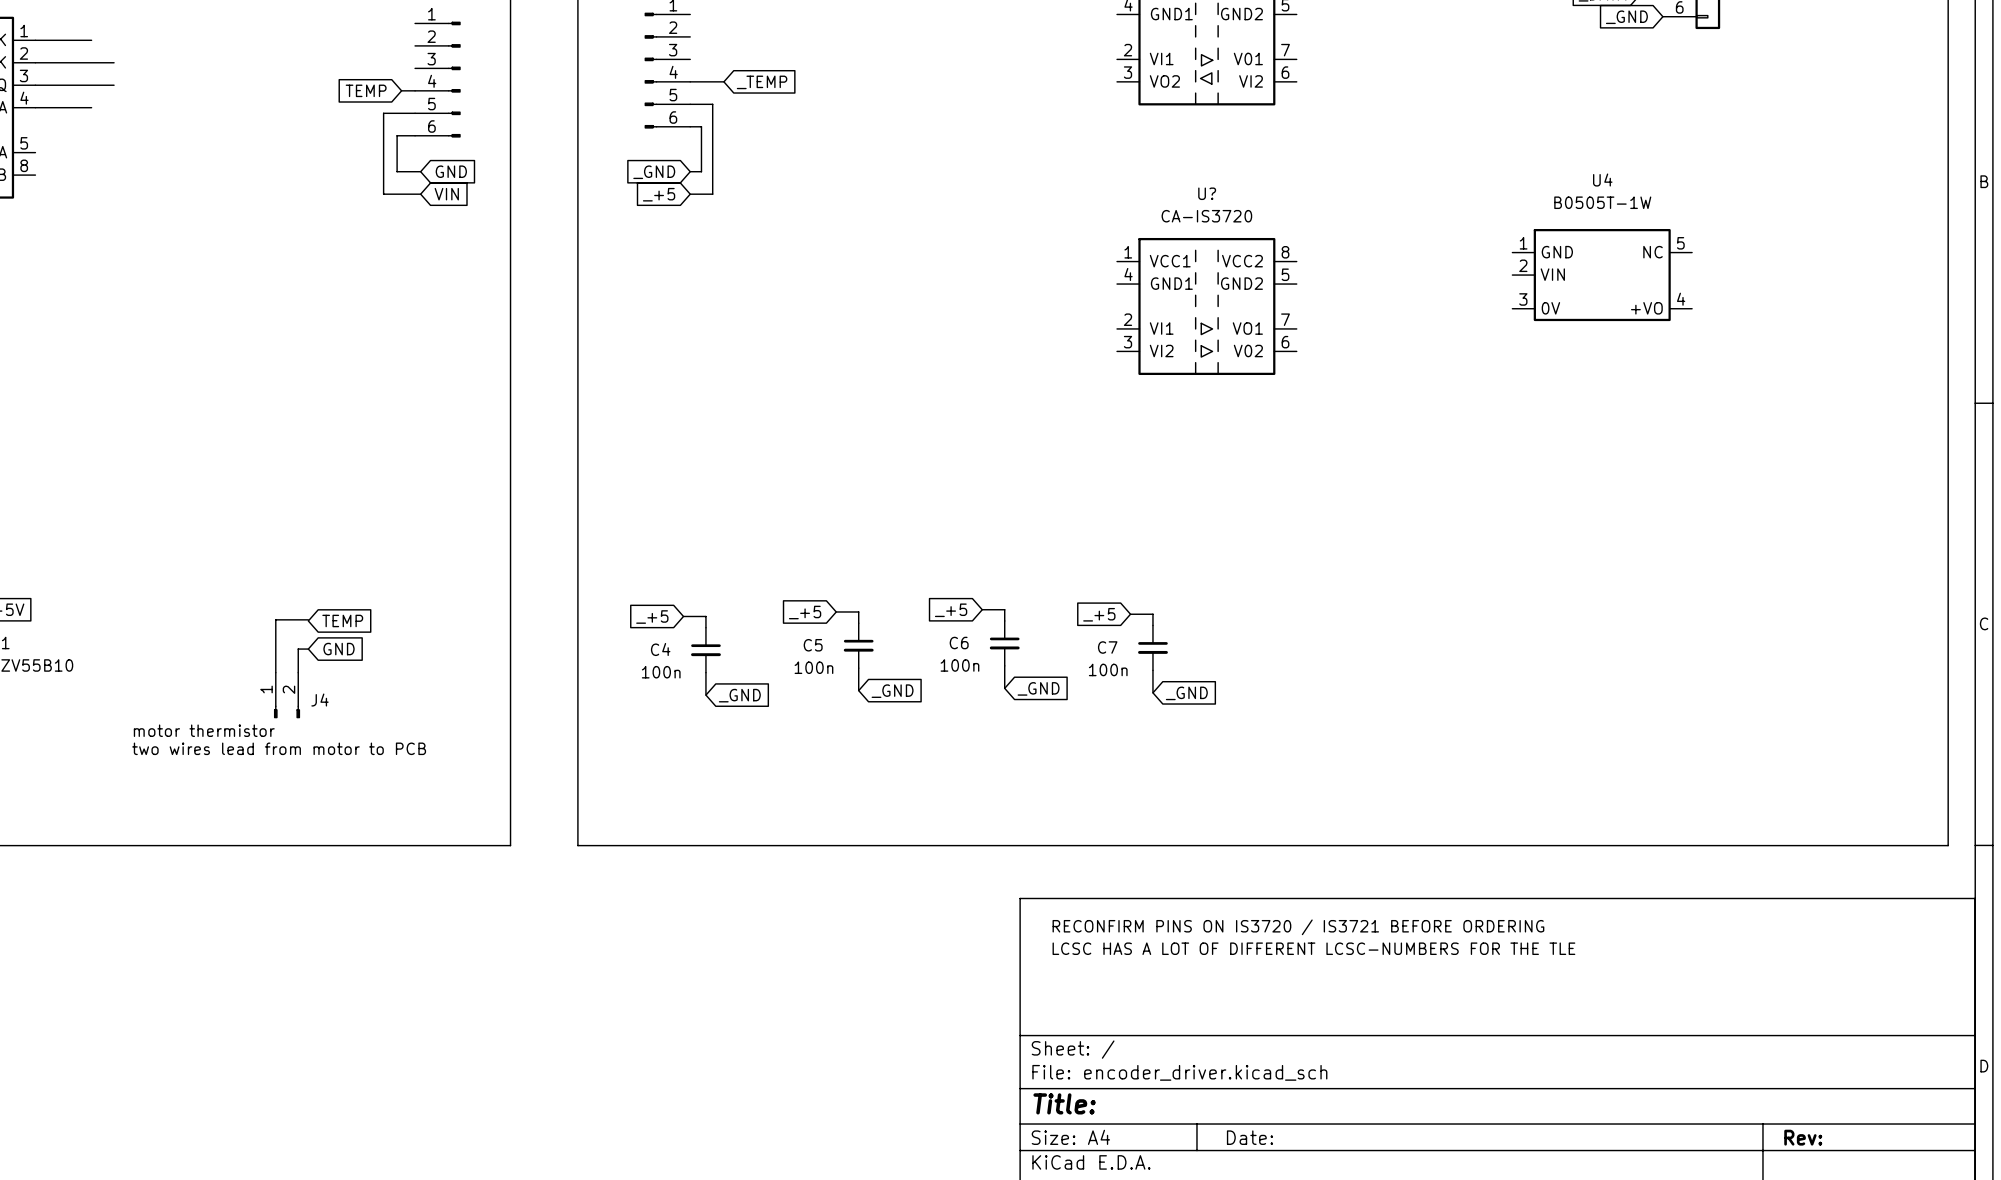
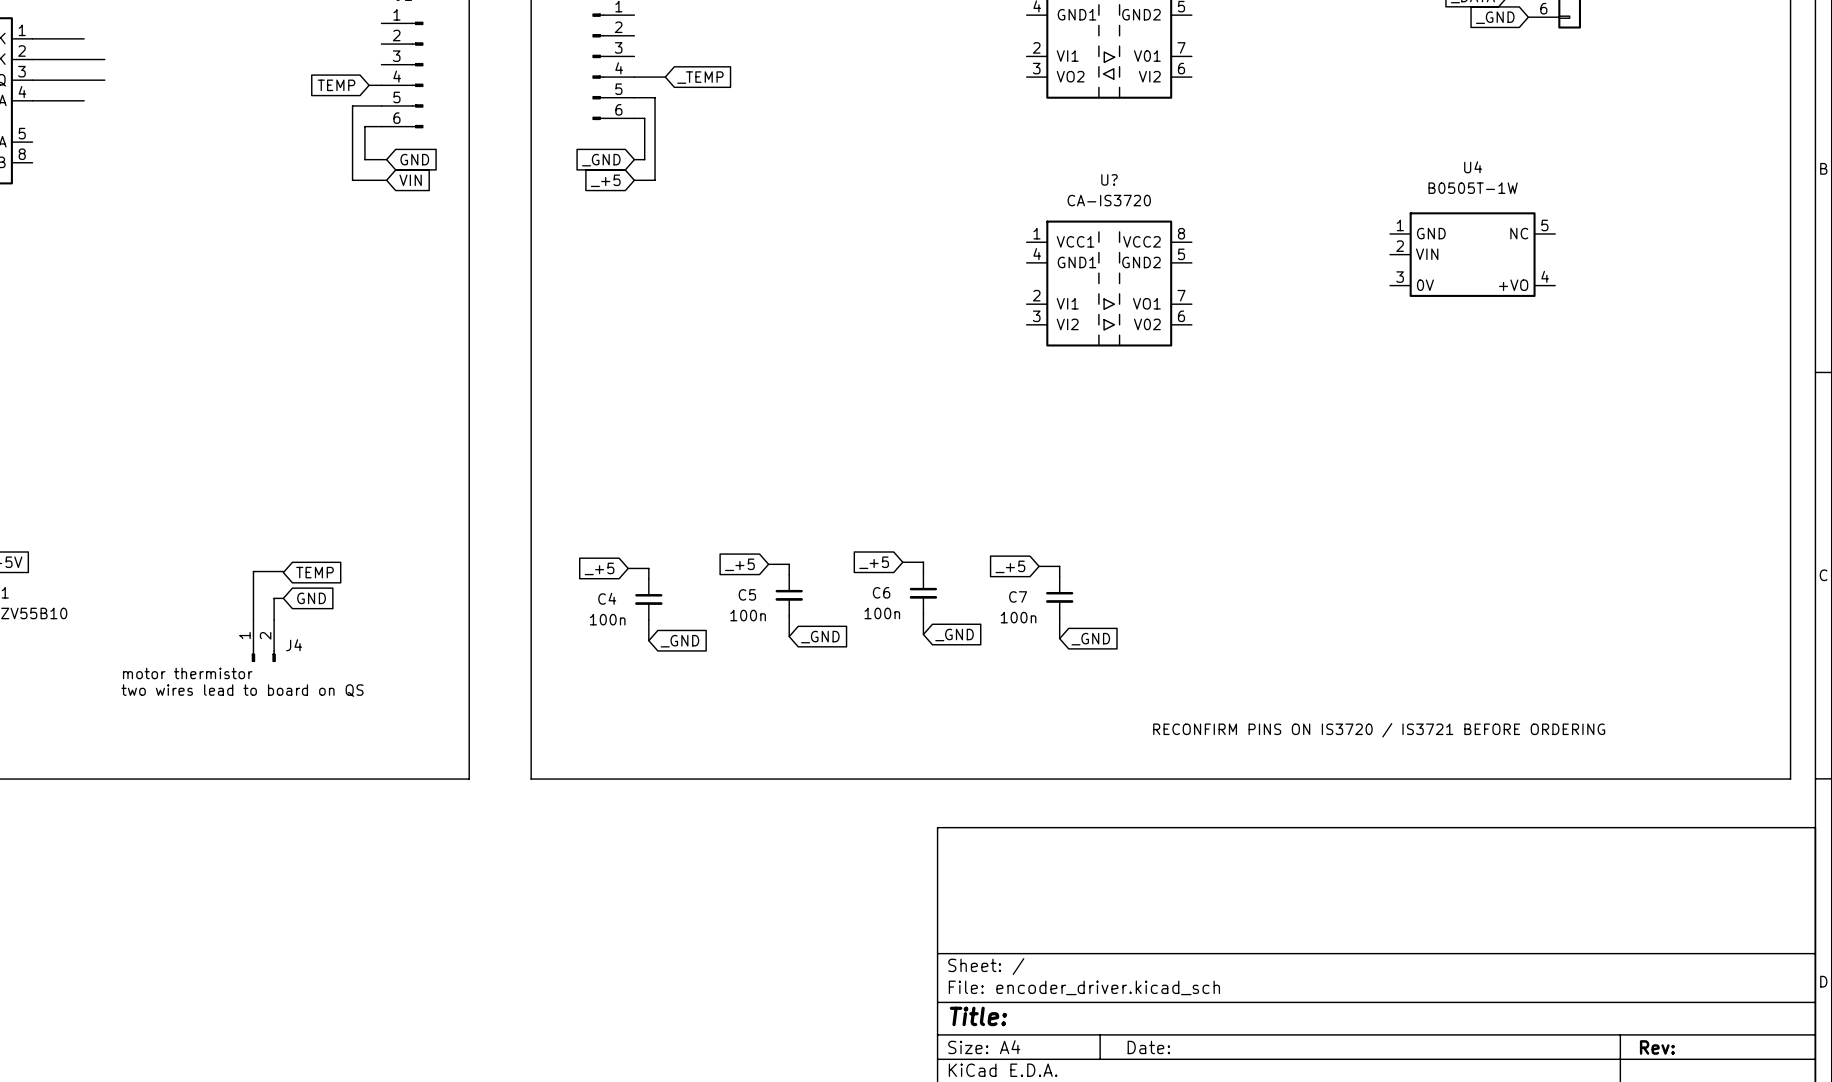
text: two wires lead from motor to PCB (279, 748) -> two wires lead to board on QS (242, 690)
text: none -> RECONFIRM PINS ON IS3720 / IS3721 BEFORE ORDERING (1379, 730)
text: RECONFIRM PINS ON IS3720 / IS3721 BEFORE ORDERING (1298, 927) -> none
text: LCSC HAS A LOT OF DIFFERENT LCSC-NUMBERS FOR THE TLE (1313, 948) -> none

